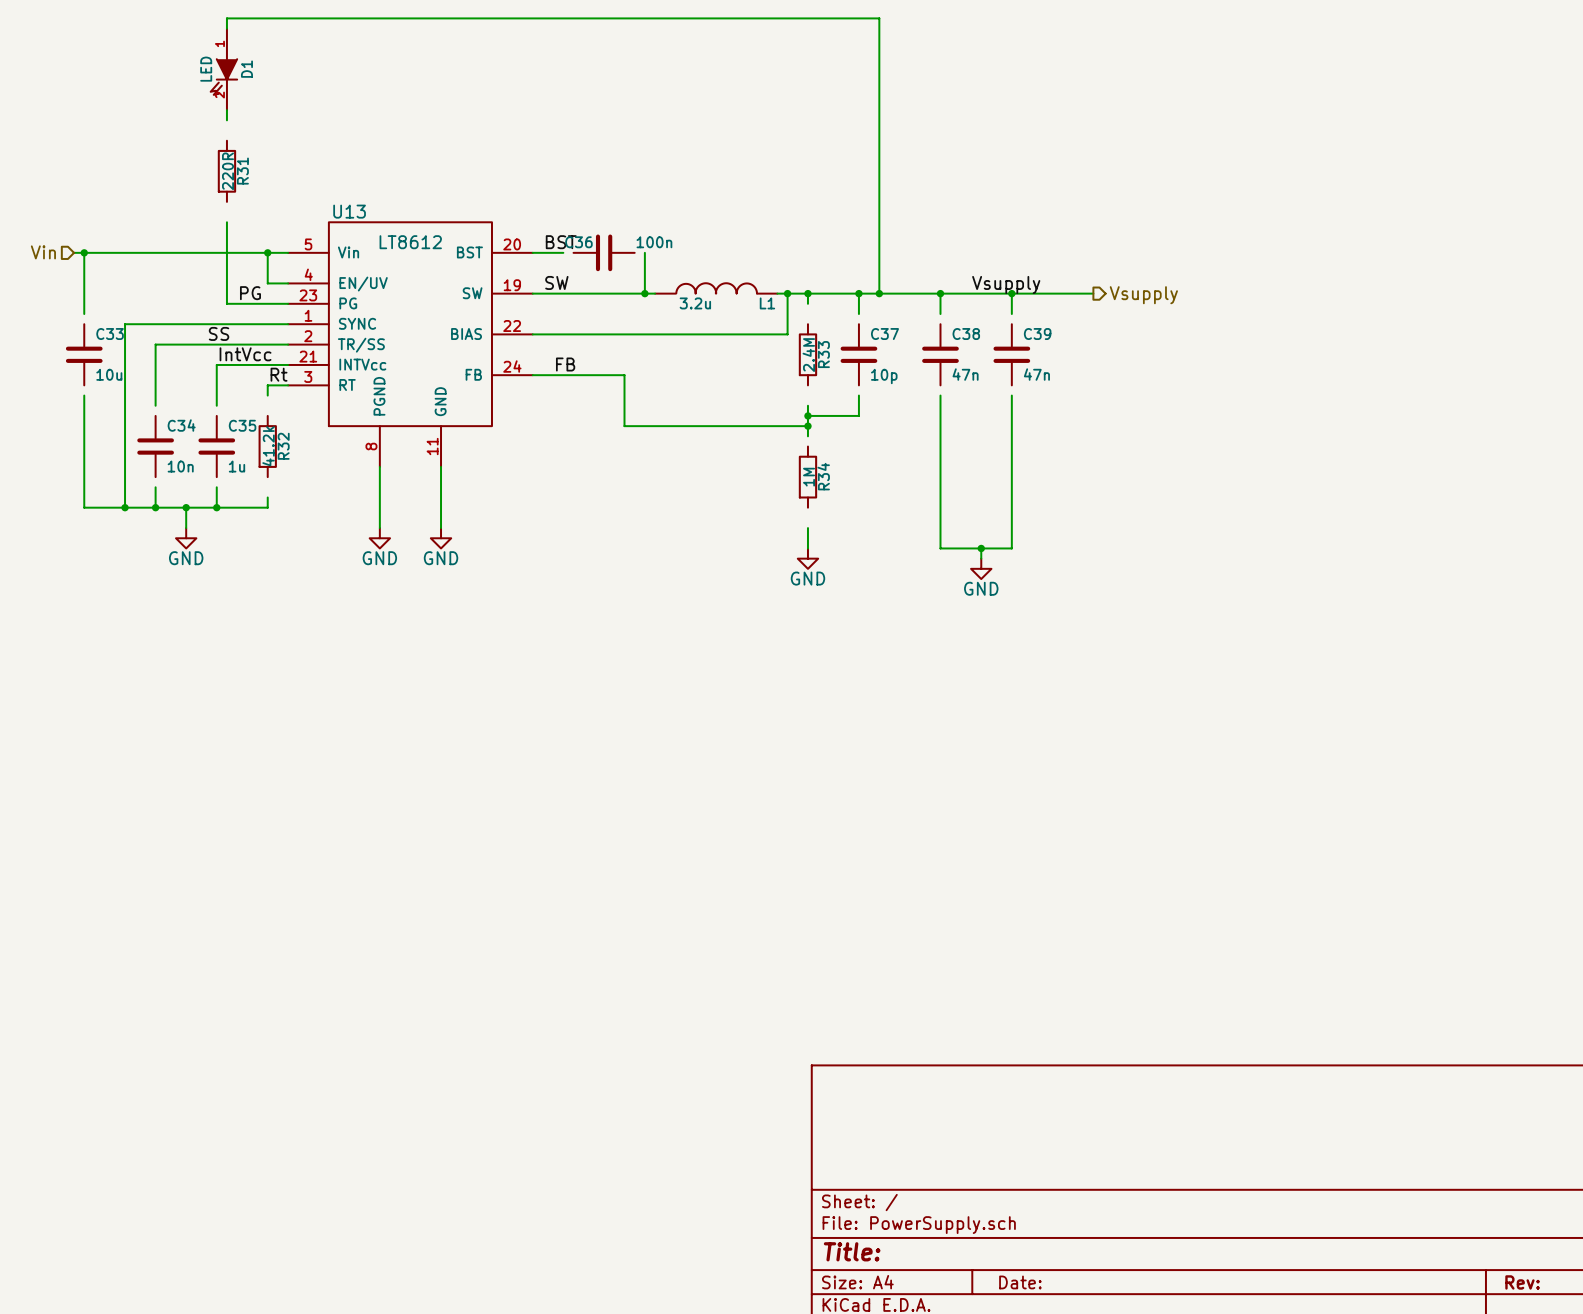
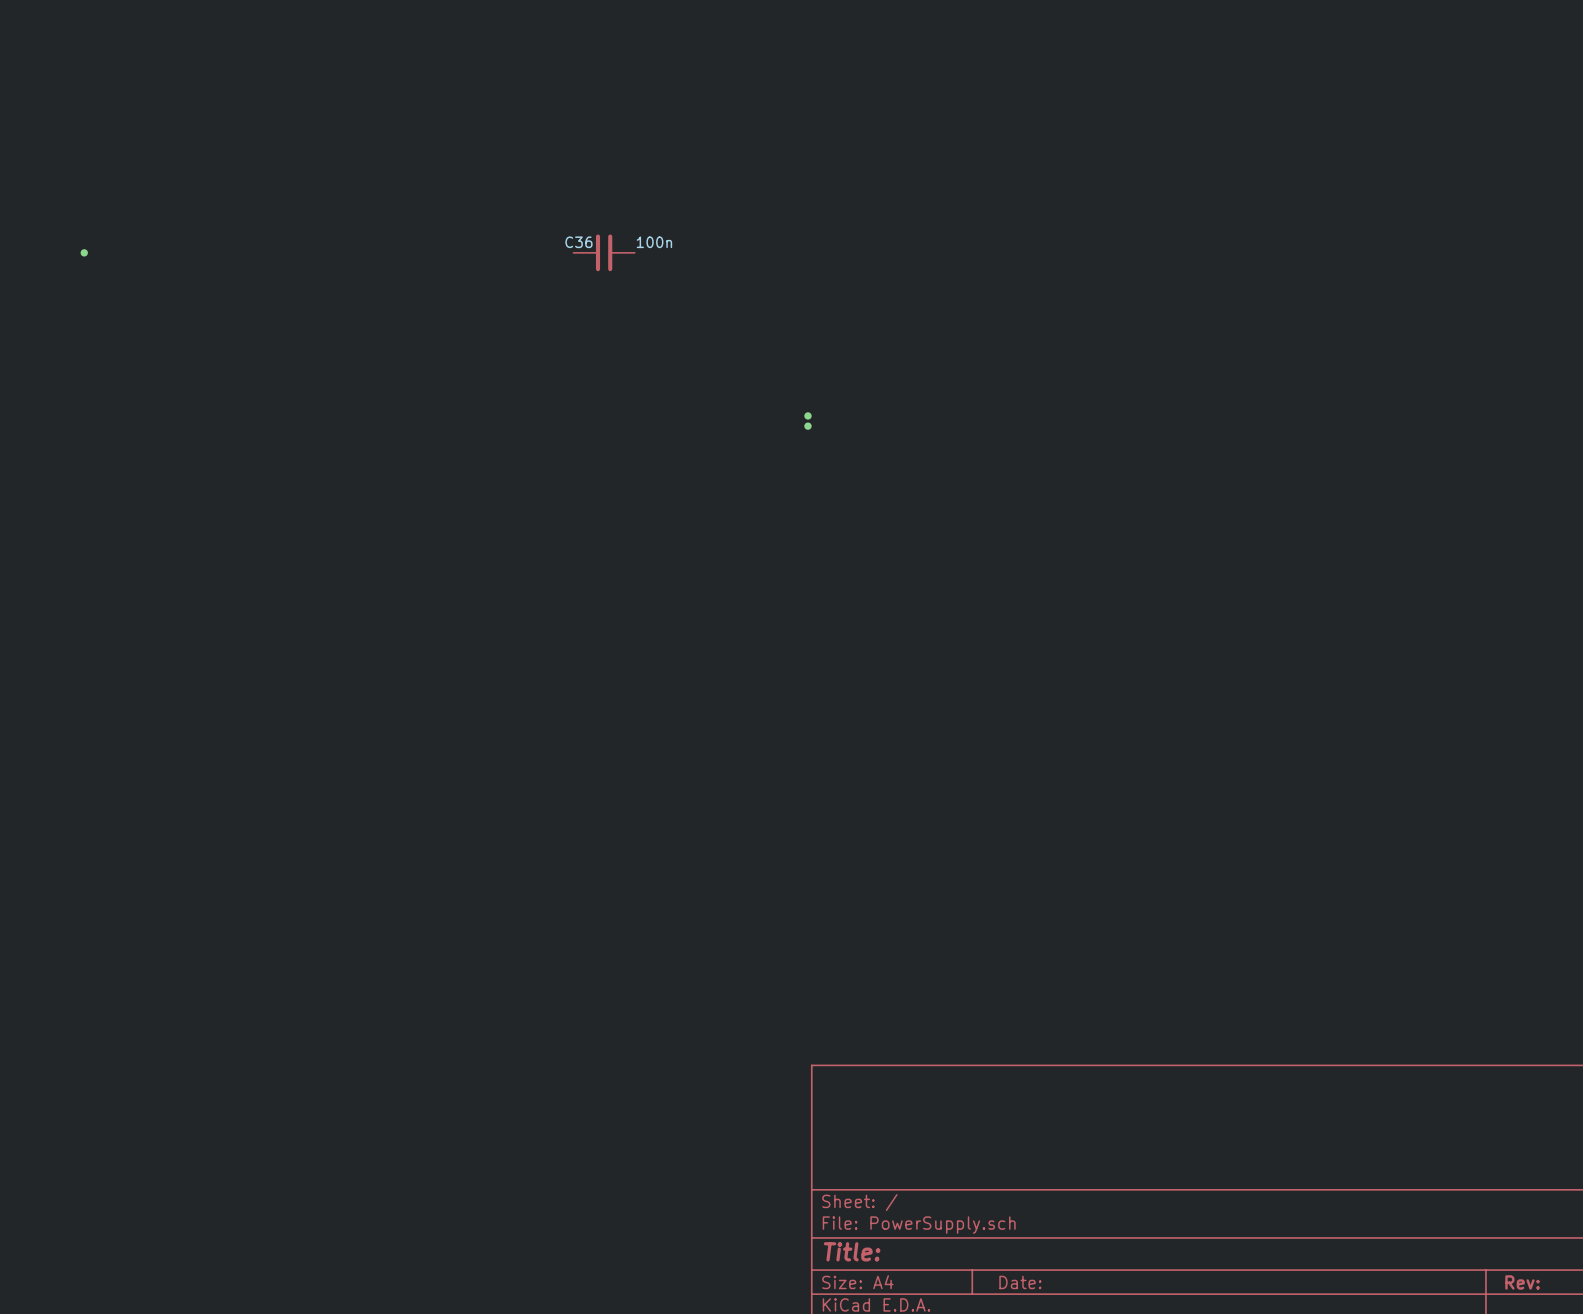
wire: (226, 28) (226, 18) (879, 18) (879, 293) -> none
D1: LED (223, 69) -> none
wire: (226, 110) (226, 120) -> none
R31: 220R (226, 171) -> none
wire: (226, 222) (226, 303) (288, 303) -> none
label: BST (561, 242) -> none
hierarchical label: Vin (43, 252) -> none
wire: (74, 252) (288, 252) -> none
wire: (84, 252) (84, 314) -> none
wire: (267, 252) (267, 283) (288, 283) -> none
junction: (267, 252) -> none
wire: (532, 252) (563, 252) -> none
wire: (644, 252) (644, 293) -> none
label: SW (556, 282) -> none
label: Vsupply (1006, 284) -> none
L1: 3.2u (716, 288) -> none
label: PG (250, 293) -> none
wire: (532, 293) (655, 293) -> none
junction: (644, 293) -> none
wire: (777, 293) (1093, 293) -> none
wire: (787, 293) (787, 334) (532, 334) -> none
junction: (787, 293) -> none
wire: (807, 293) (807, 303) -> none
junction: (807, 293) -> none
wire: (858, 293) (858, 314) -> none
junction: (858, 293) -> none
junction: (879, 293) -> none
wire: (940, 293) (940, 314) -> none
junction: (940, 293) -> none
wire: (1011, 293) (1011, 314) -> none
junction: (1011, 293) -> none
hierarchical label: Vsupply (1143, 295) -> none
wire: (288, 324) (125, 324) (125, 507) -> none
label: SS (219, 333) -> none
wire: (288, 344) (155, 344) (155, 405) -> none
U13: LT8612 (410, 344) -> none
C33: 10u (84, 354) -> none
label: IntVcc (245, 354) -> none
R33: 2.4M (807, 354) -> none
C37: 10p (858, 354) -> none
C38: 47n (940, 354) -> none
C39: 47n (1011, 354) -> none
wire: (288, 364) (216, 364) (216, 405) -> none
label: FB (565, 364) -> none
label: Rt (279, 374) -> none
wire: (532, 375) (624, 375) (624, 426) (807, 426) -> none
wire: (288, 385) (267, 385) (267, 395) -> none
wire: (84, 395) (84, 507) (267, 507) (267, 497) -> none
wire: (858, 395) (858, 415) (807, 415) -> none
wire: (940, 395) (940, 548) (1011, 548) (1011, 395) -> none
wire: (807, 405) (807, 436) -> none
C34: 10n (155, 446) -> none
C35: 1u (216, 446) -> none
R32: 41.2k (267, 446) -> none
wire: (379, 466) (379, 528) -> none
wire: (441, 466) (441, 528) -> none
R34: 1M (807, 477) -> none
wire: (155, 487) (155, 507) -> none
wire: (216, 487) (216, 507) -> none
junction: (125, 507) -> none
junction: (155, 507) -> none
wire: (186, 507) (186, 528) -> none
junction: (186, 507) -> none
junction: (216, 507) -> none
wire: (807, 528) (807, 548) -> none
power symbol: GND (186, 538) -> none
power symbol: GND (379, 538) -> none
power symbol: GND (441, 538) -> none
wire: (981, 548) (981, 558) -> none
junction: (981, 548) -> none
power symbol: GND (807, 558) -> none
power symbol: GND (981, 568) -> none

